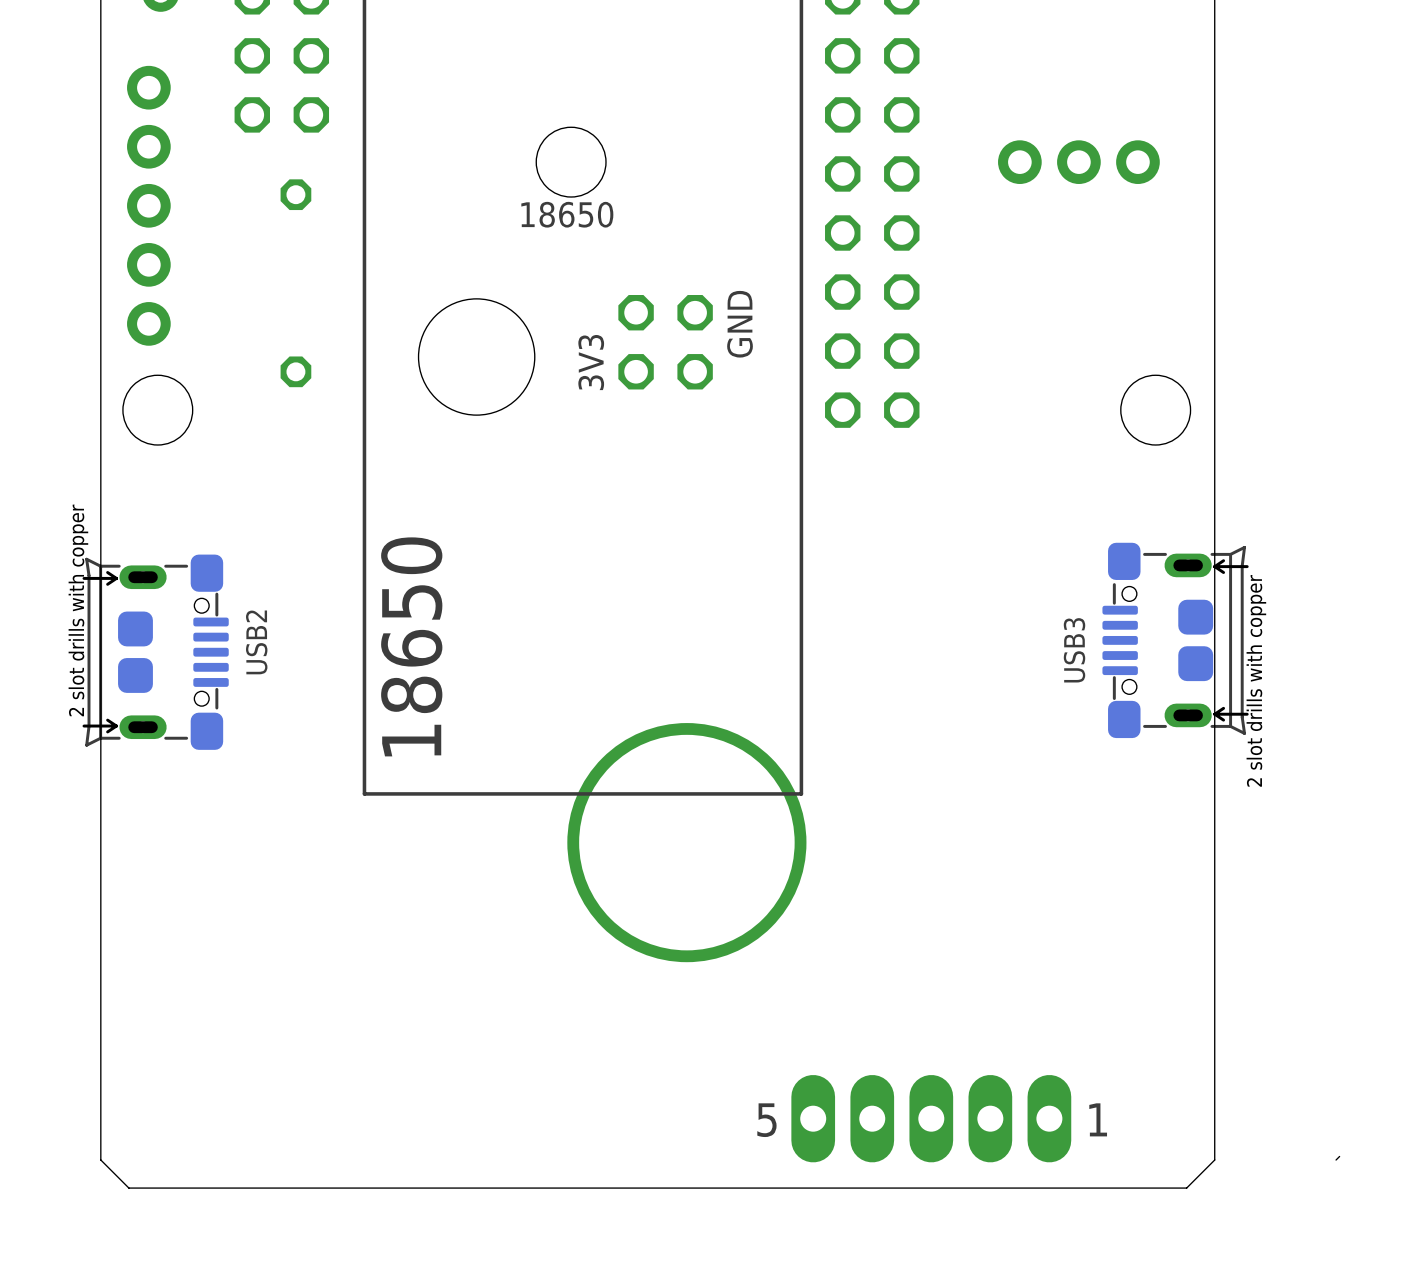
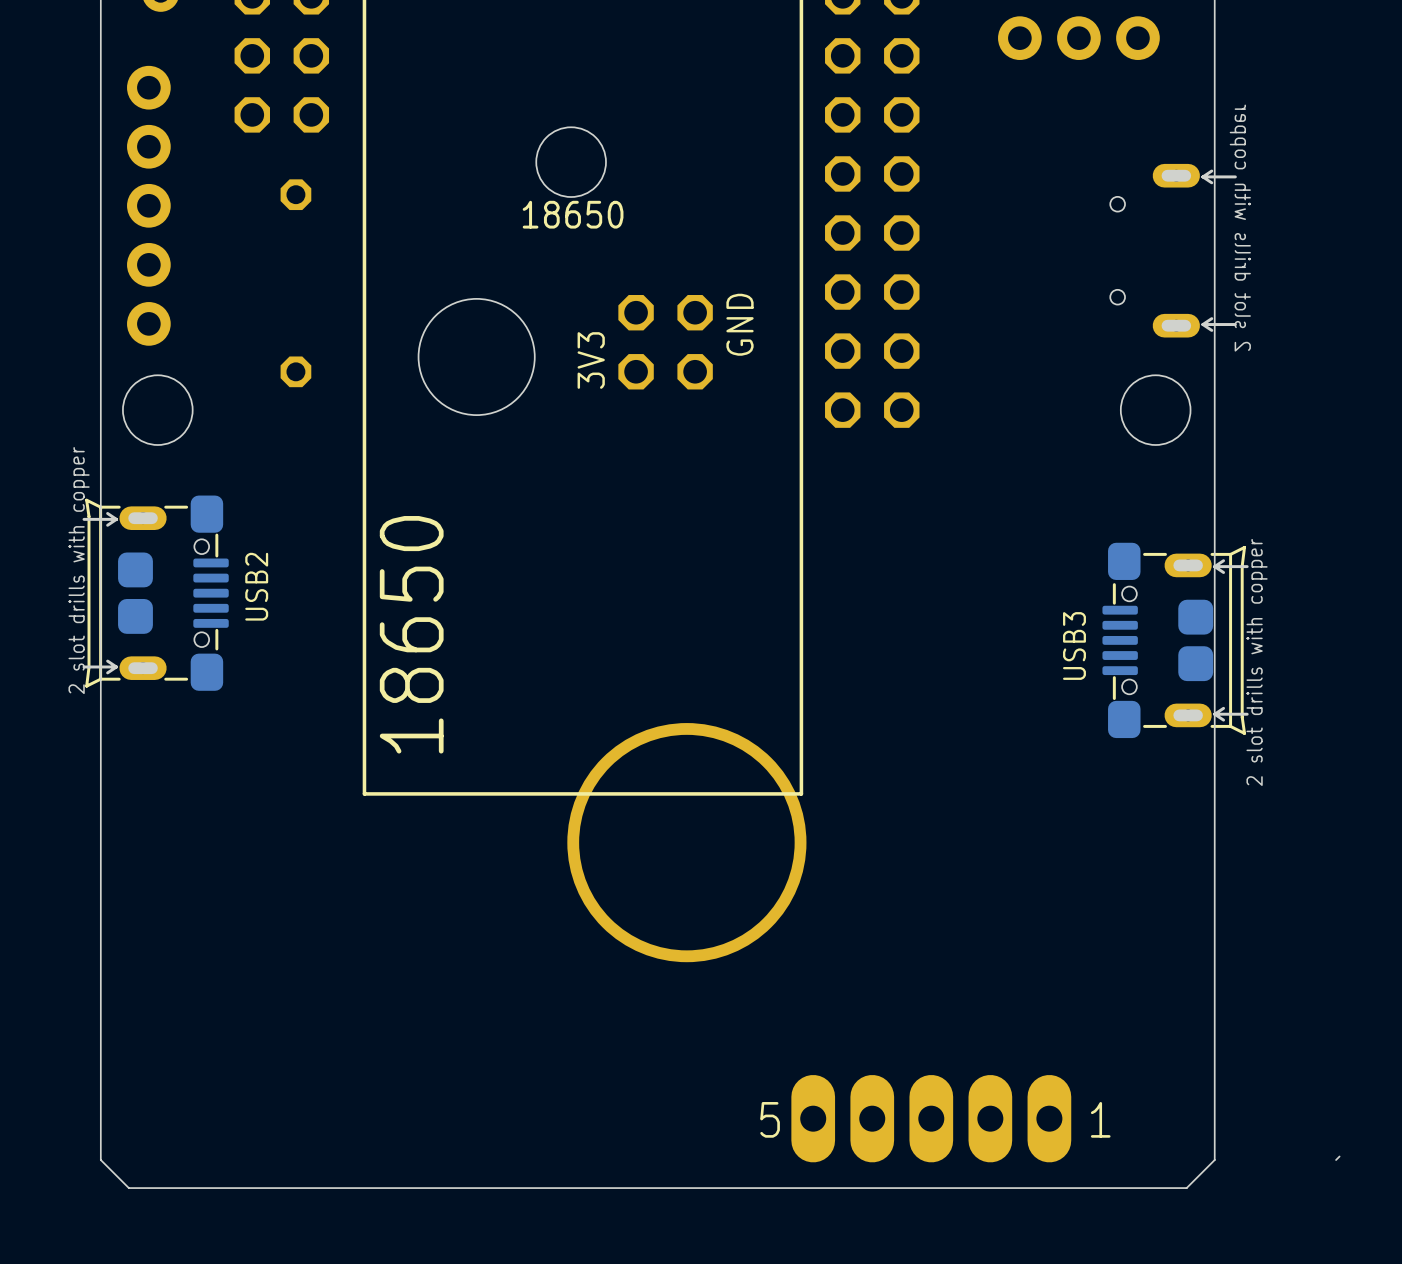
part position: (1078, 162) -> (1078, 38)
part: none -> (1173, 250)
USB2 position: (155, 652) -> (155, 593)

